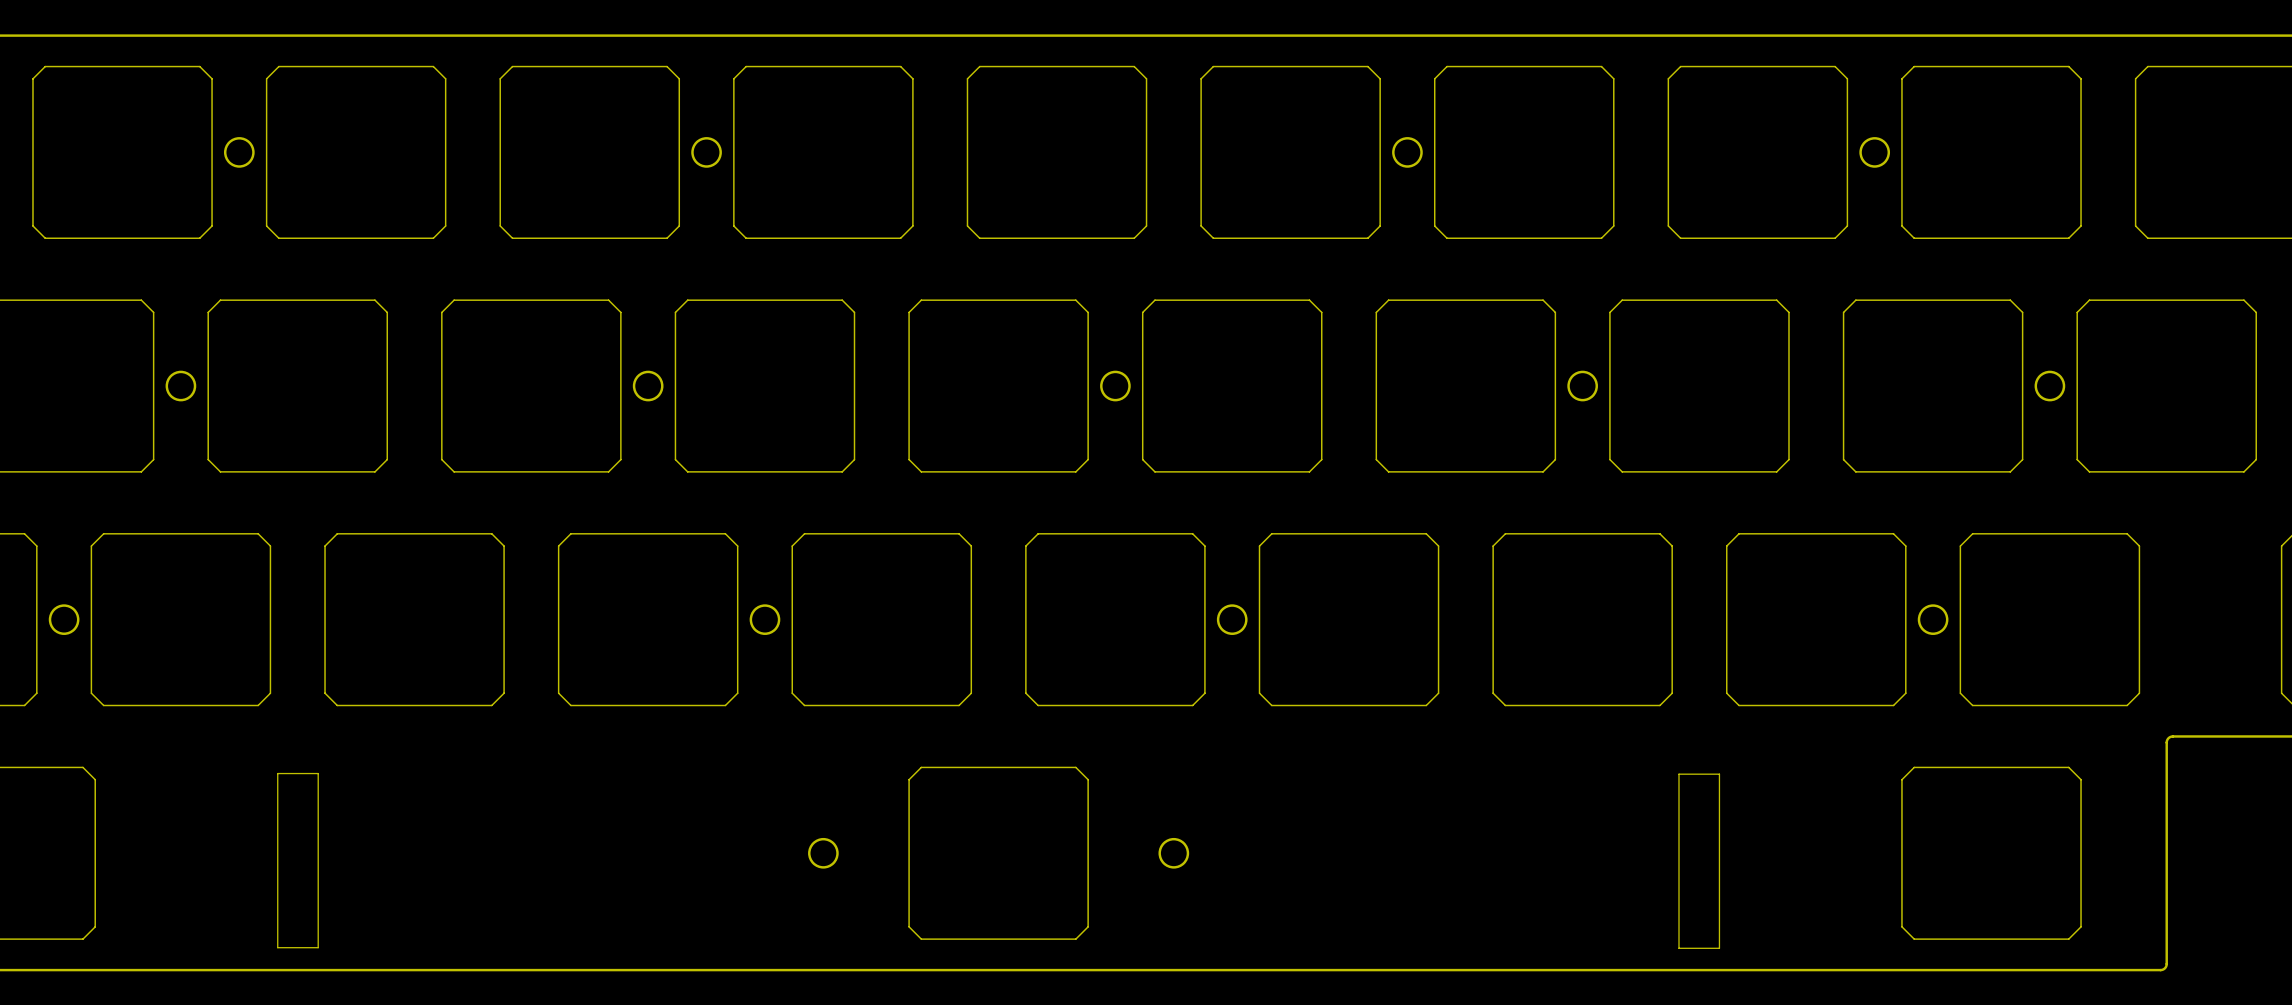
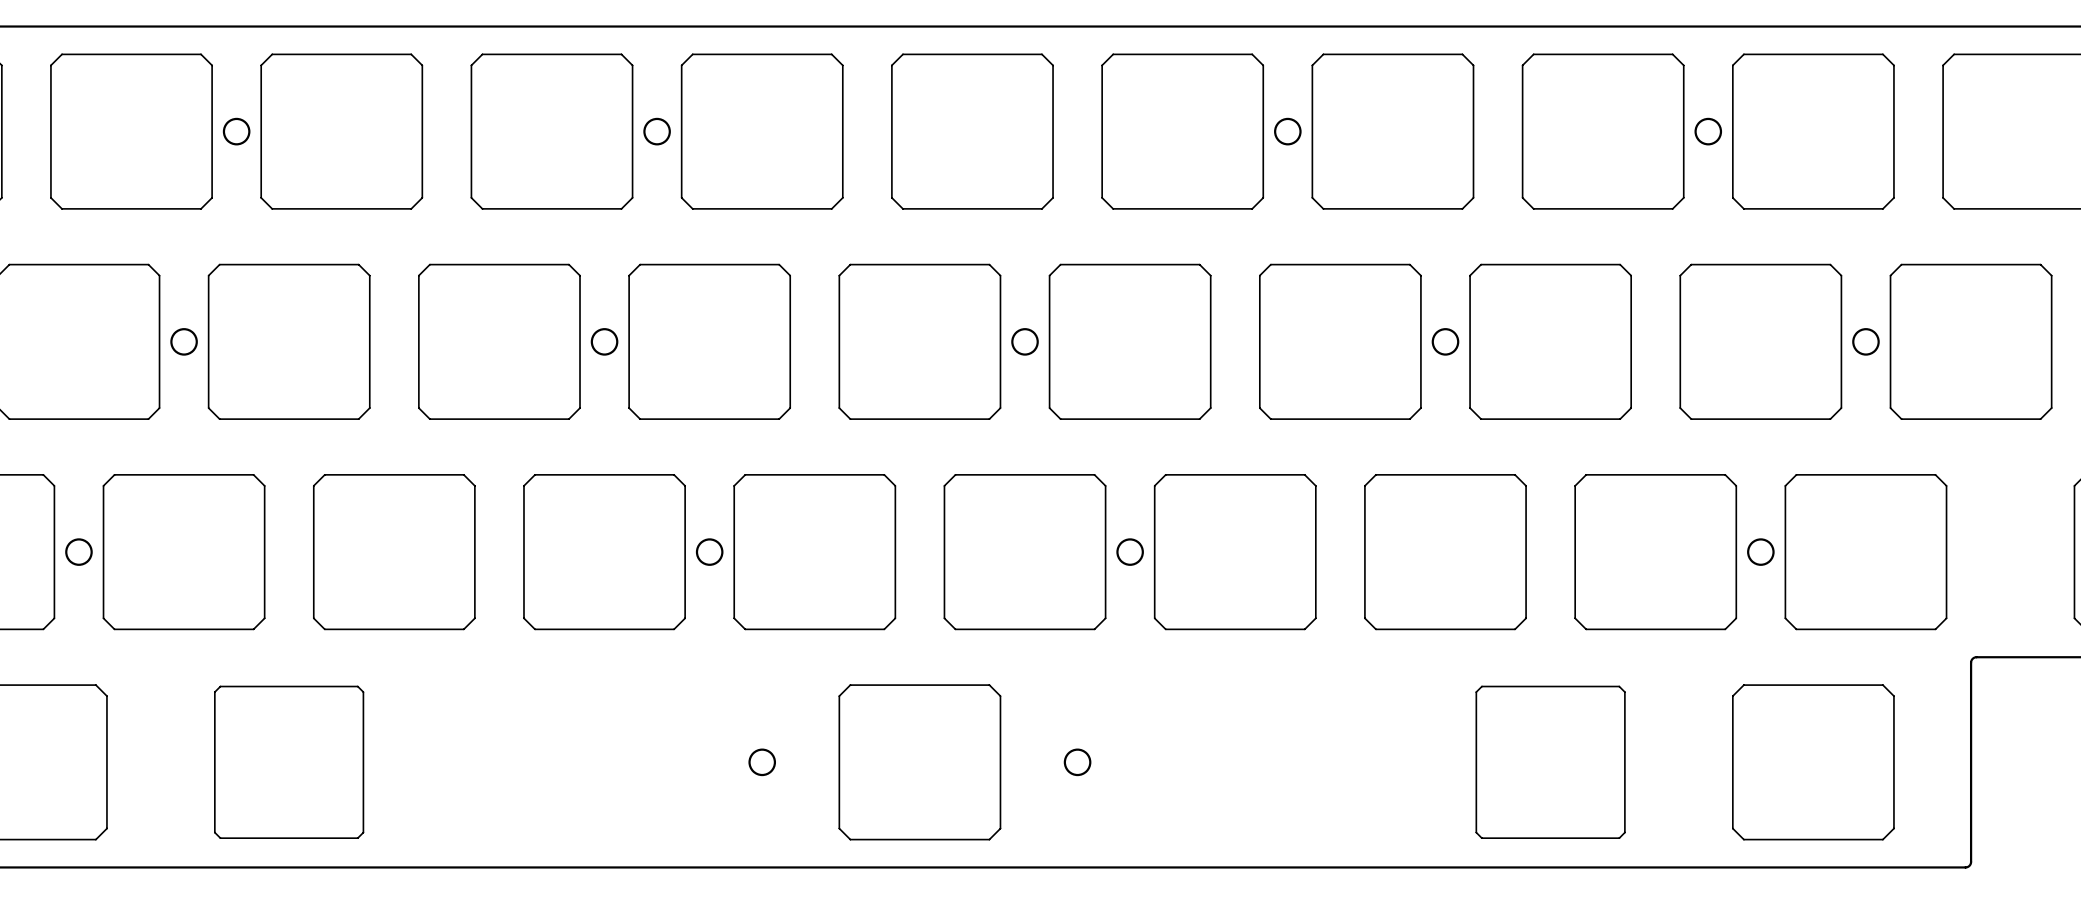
drawing shape: [277, 773, 1720, 949] -> [214, 685, 1626, 839]

